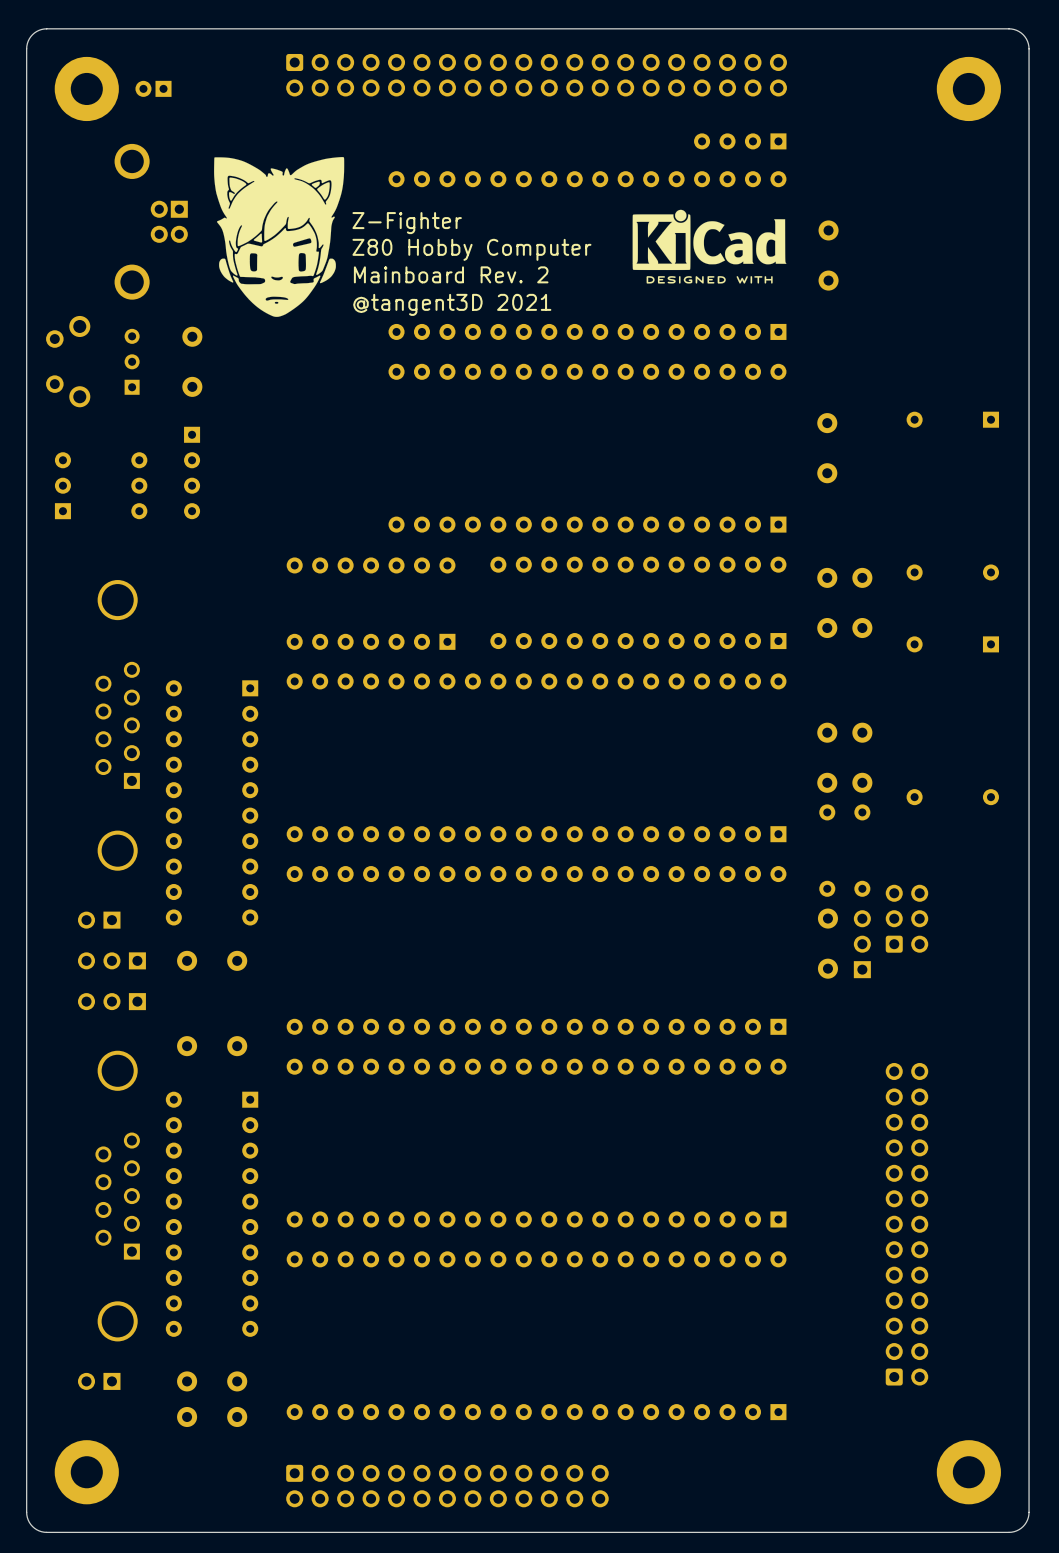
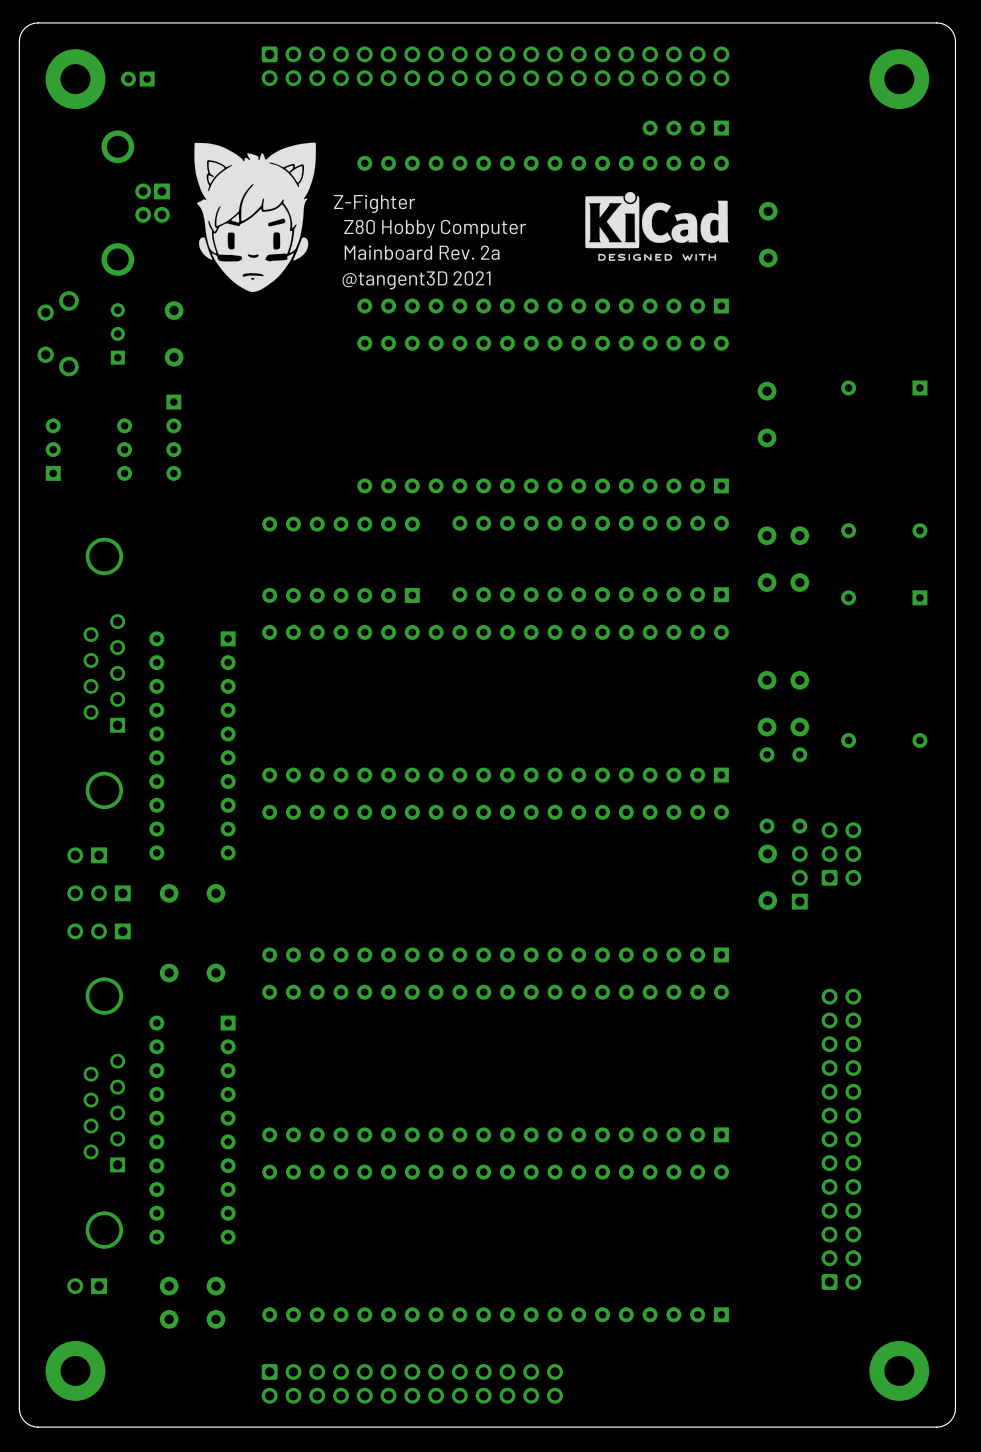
text: Mainboard Rev. 2 (451, 274) -> Mainboard Rev. 2a (422, 252)

